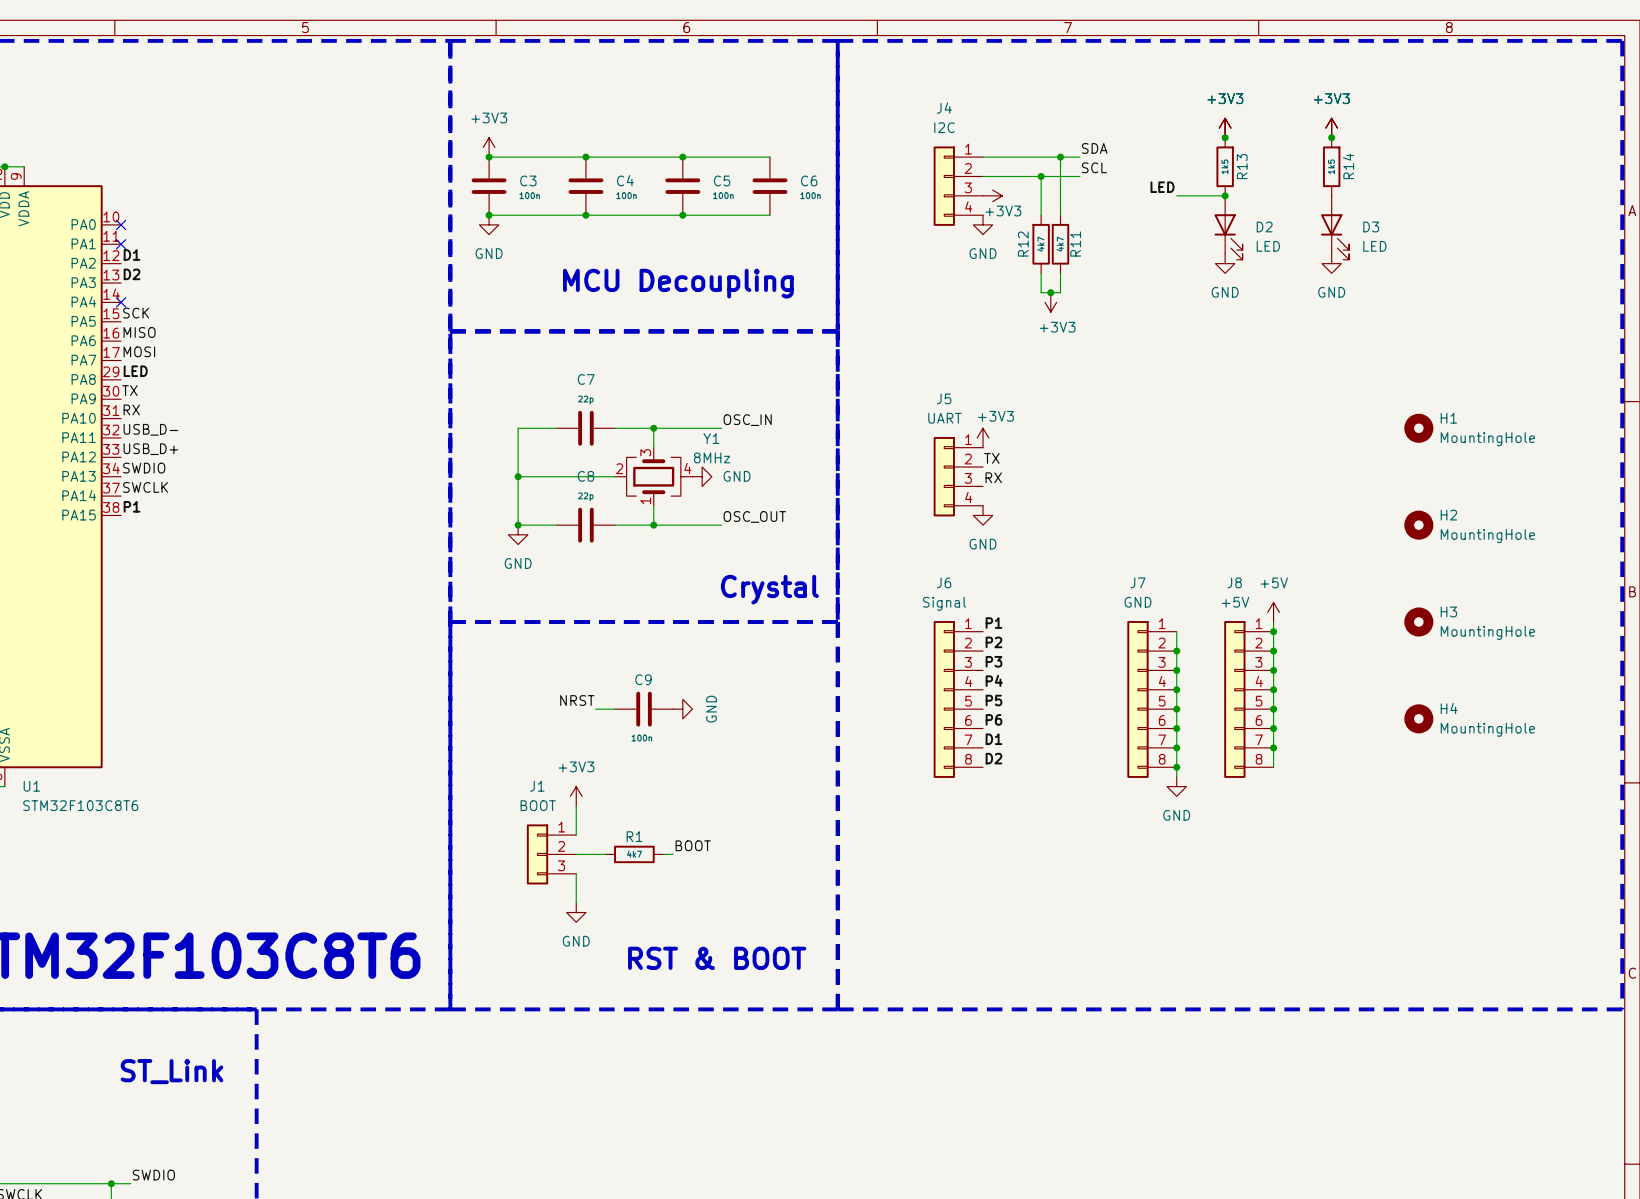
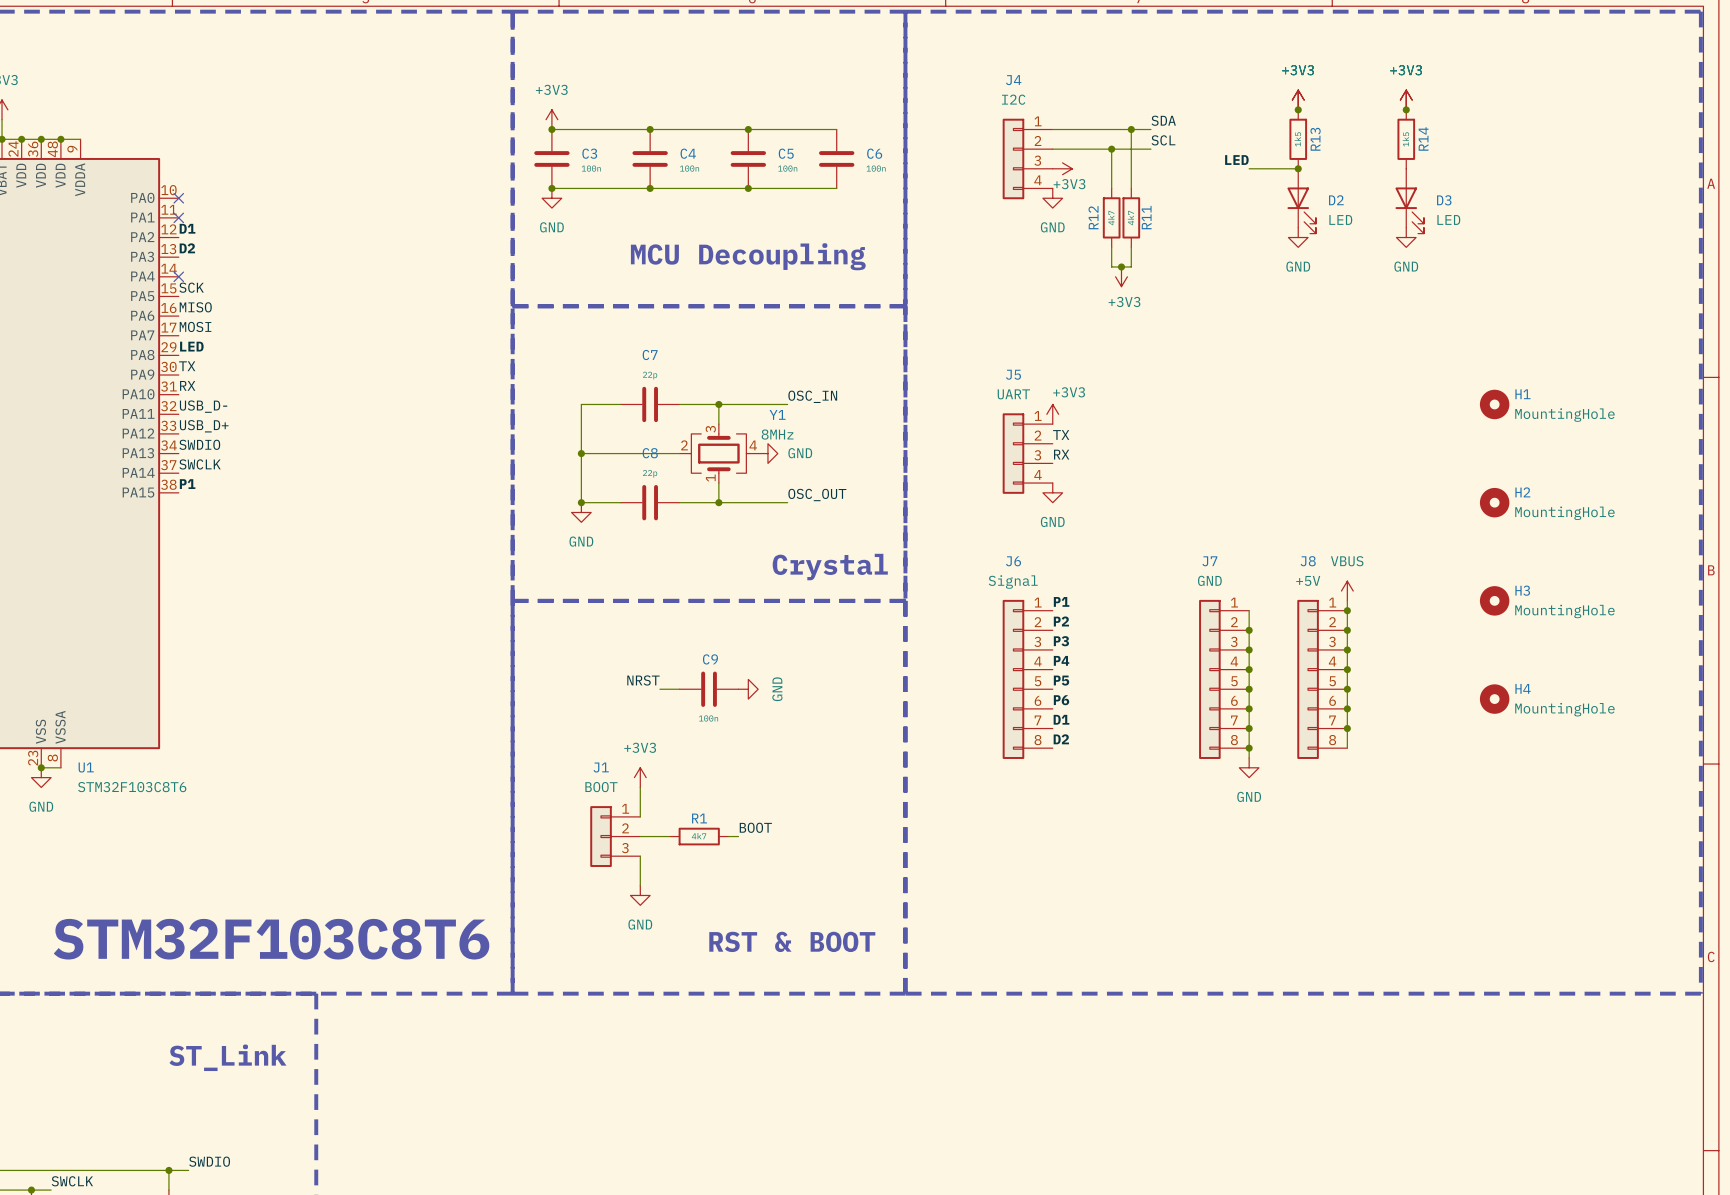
power symbol: +5V (1273, 612) -> VBUS (1347, 591)

